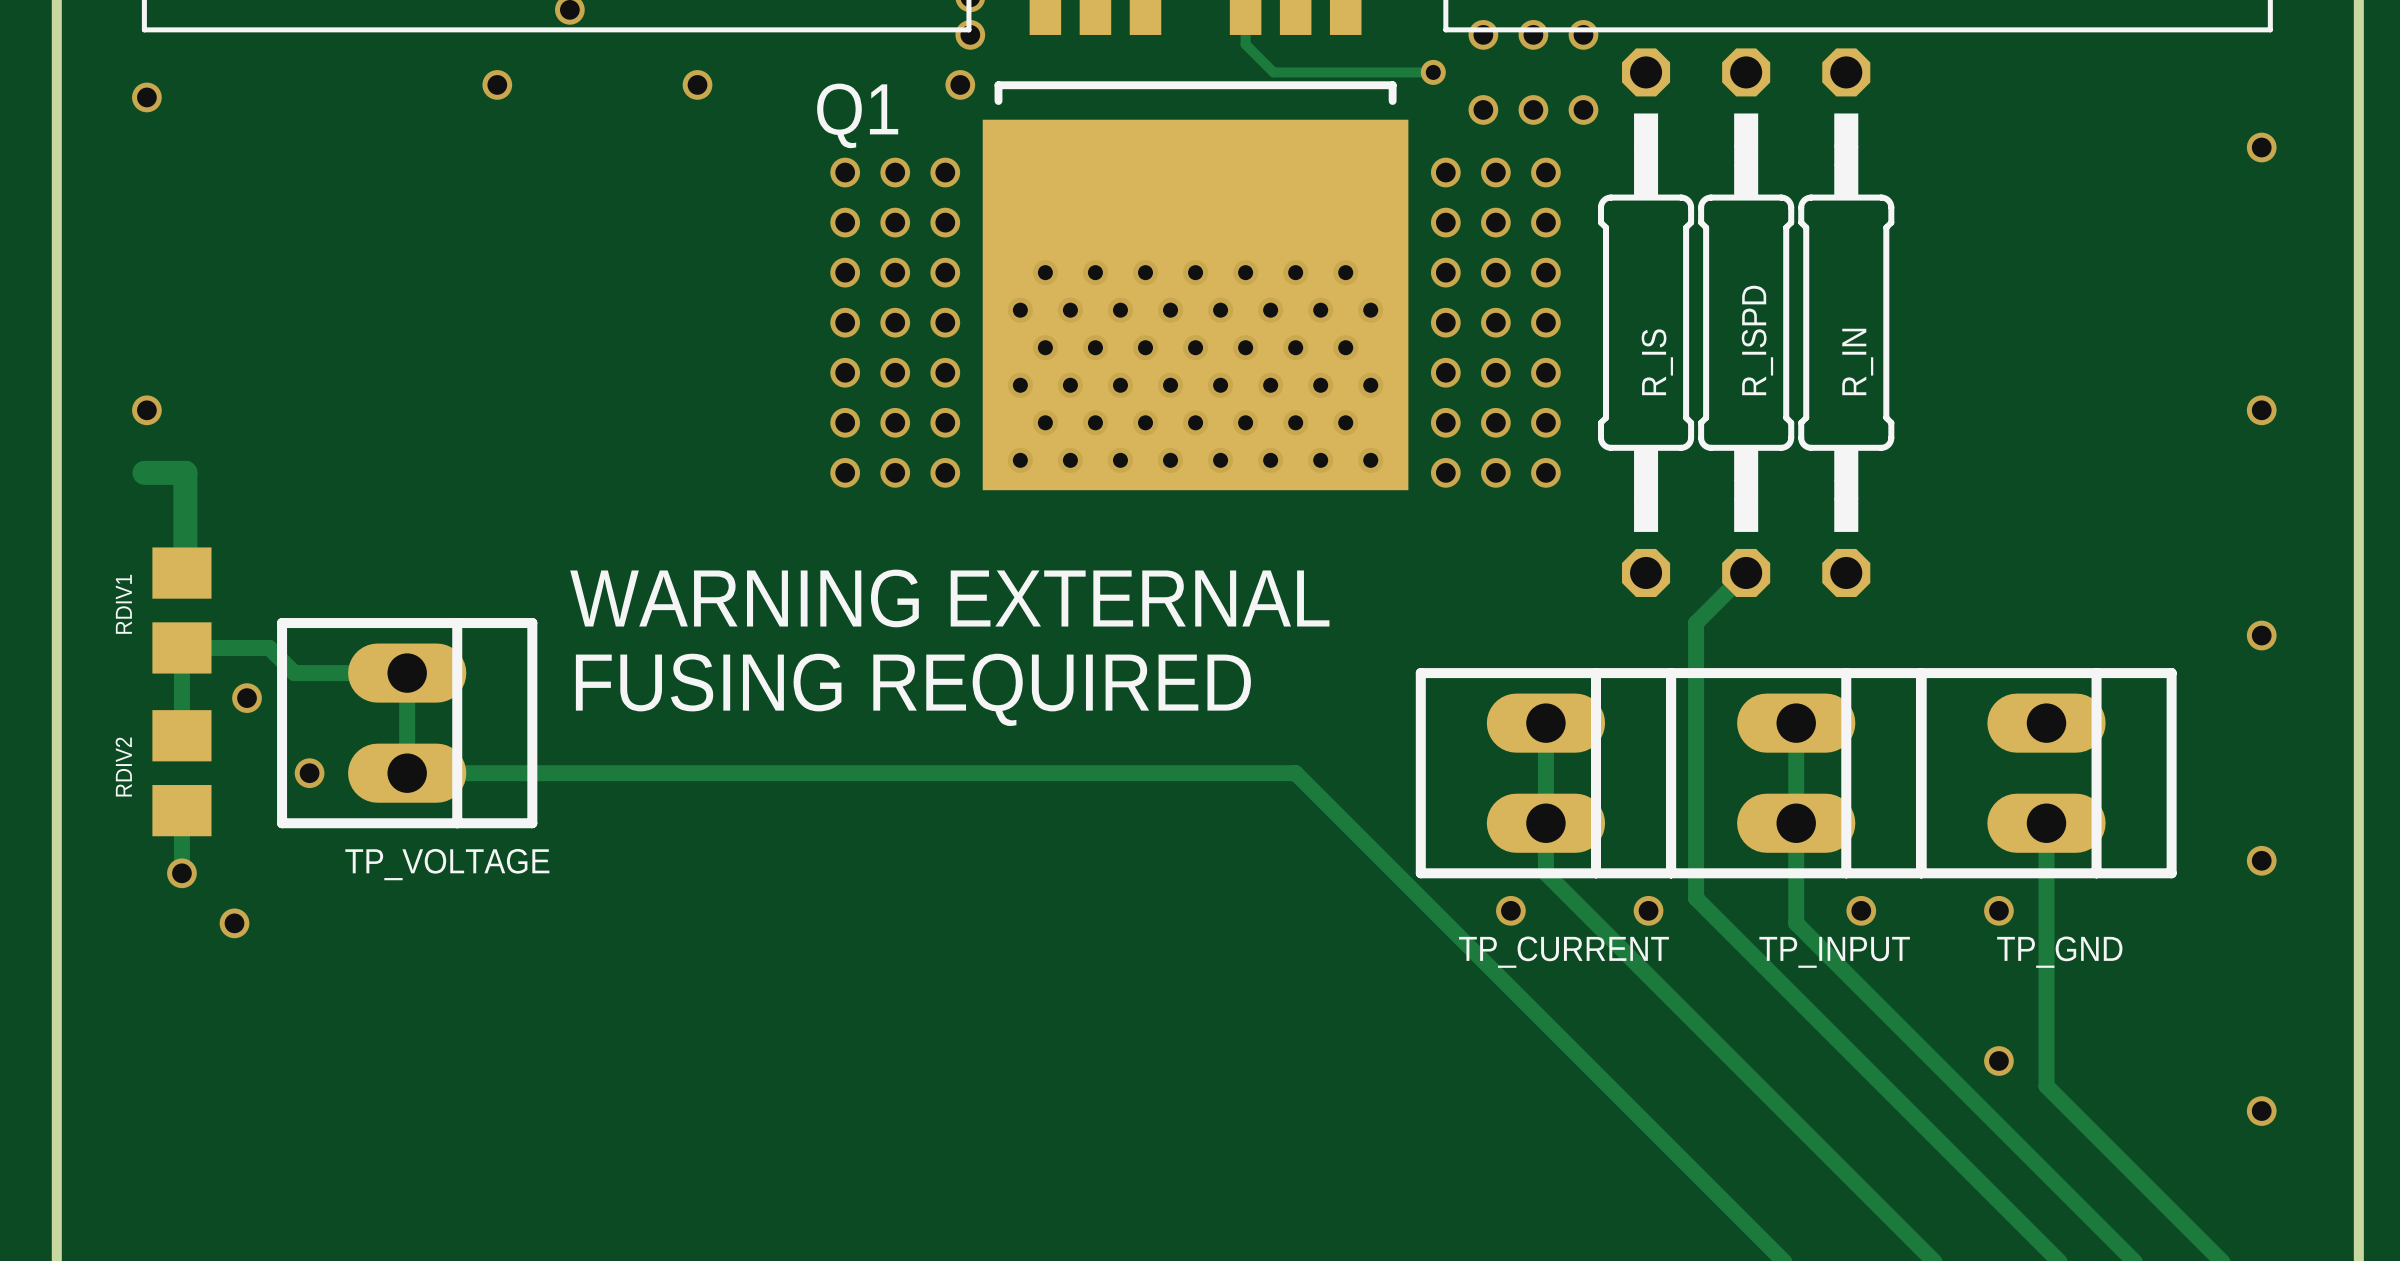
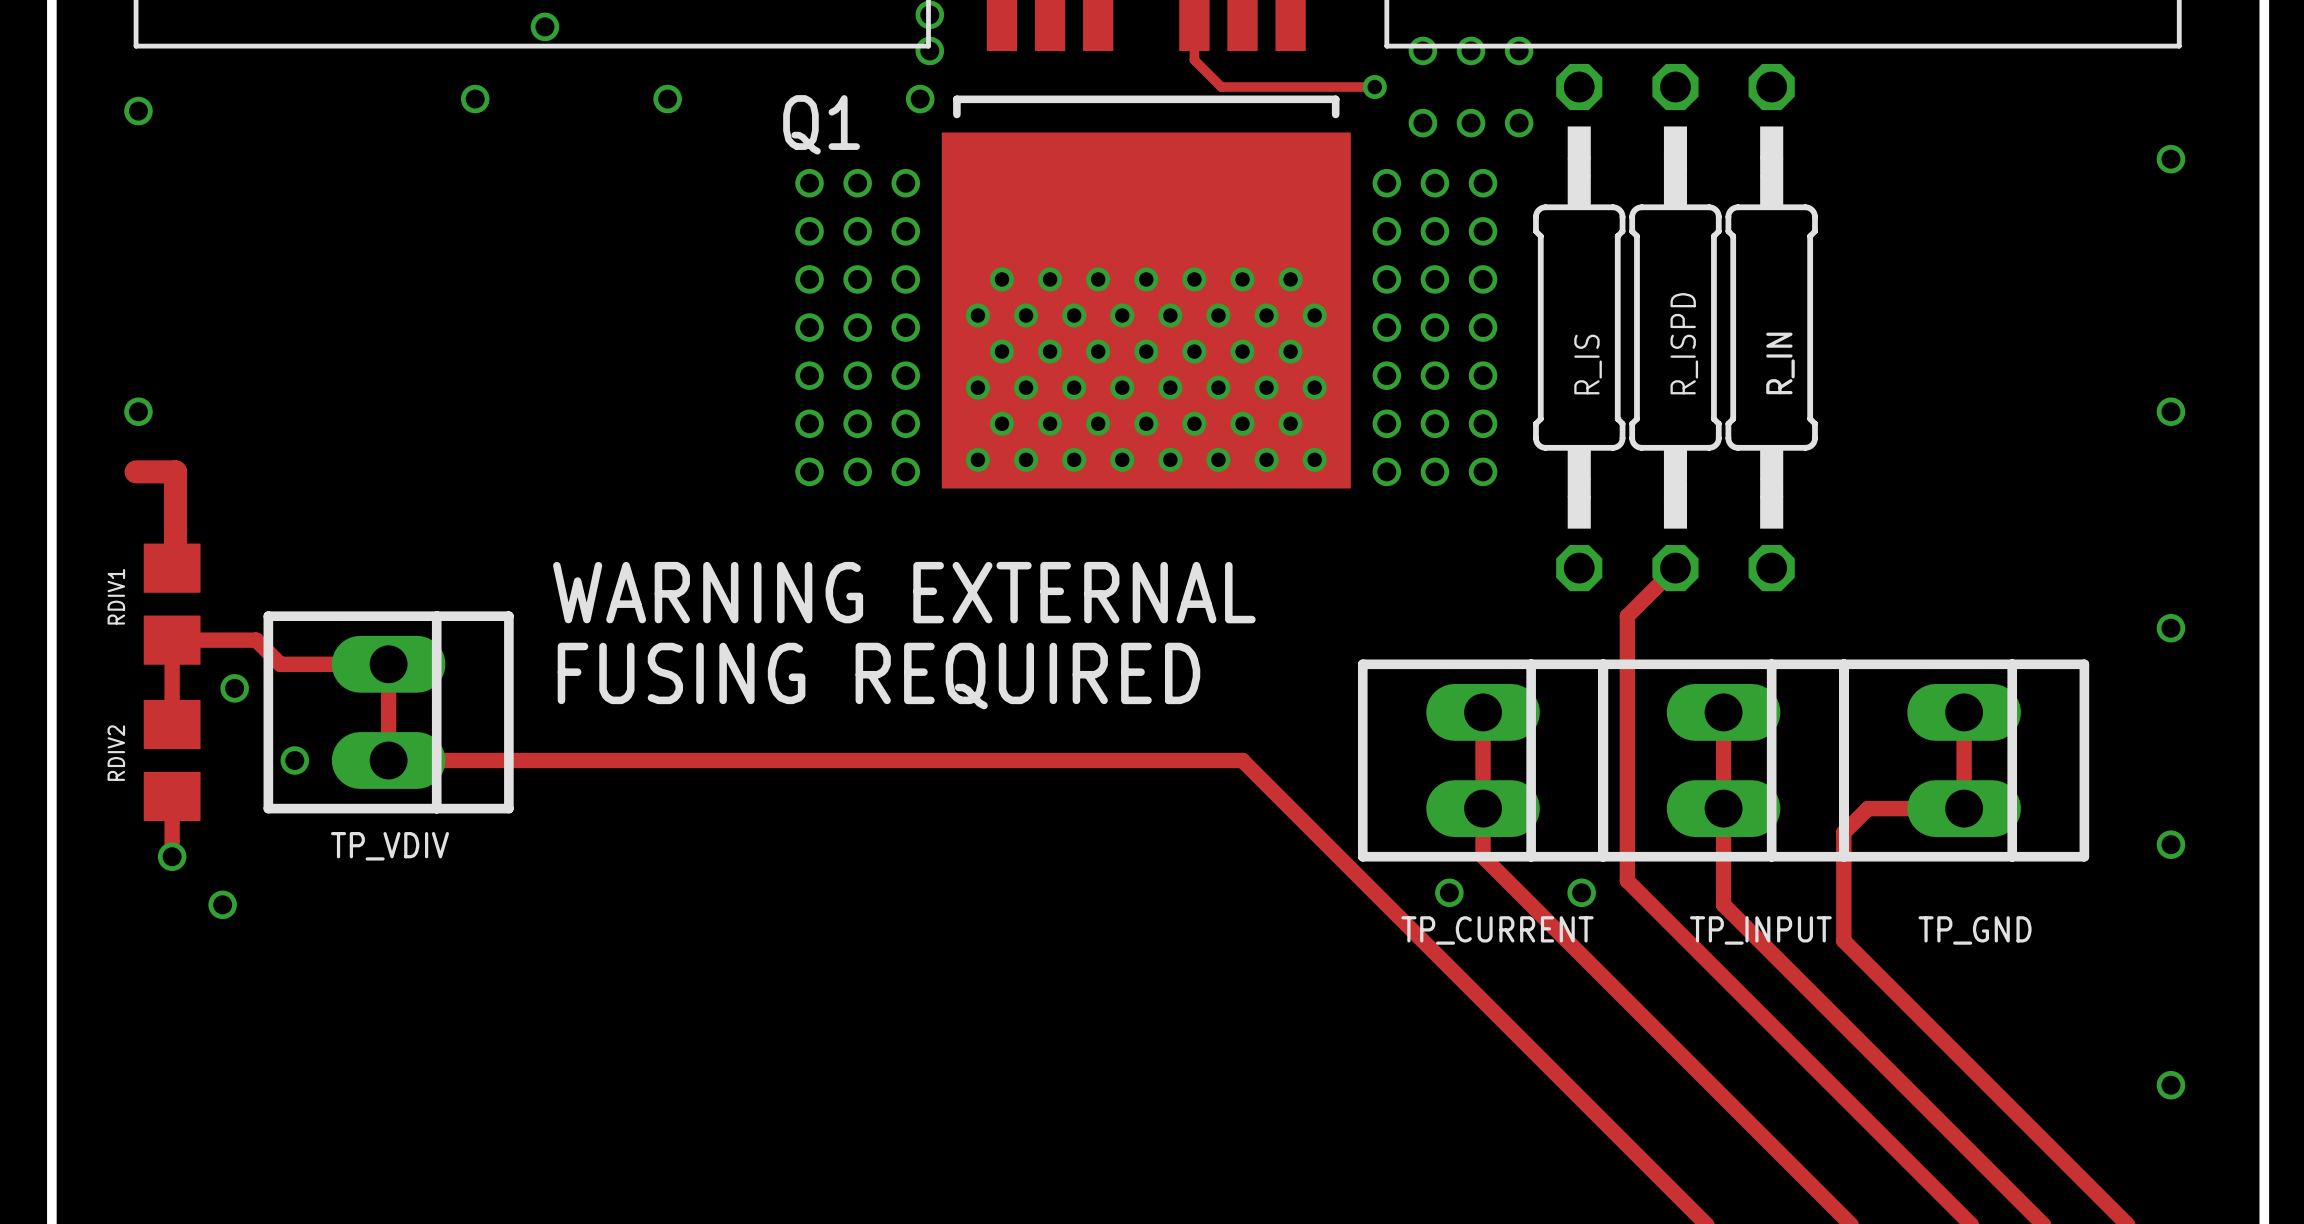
track: (2046, 823) (2046, 1086) -> (1964, 712) (1964, 808) (1867, 808) (1843, 832) (1843, 940) (1964, 1061)
TP_VOLTAGE name: TP_VOLTAGE (447, 864) -> TP_VDIV (389, 846)
via: (1861, 910) -> none
via: (1998, 910) -> none
via: (1998, 1061) -> none

